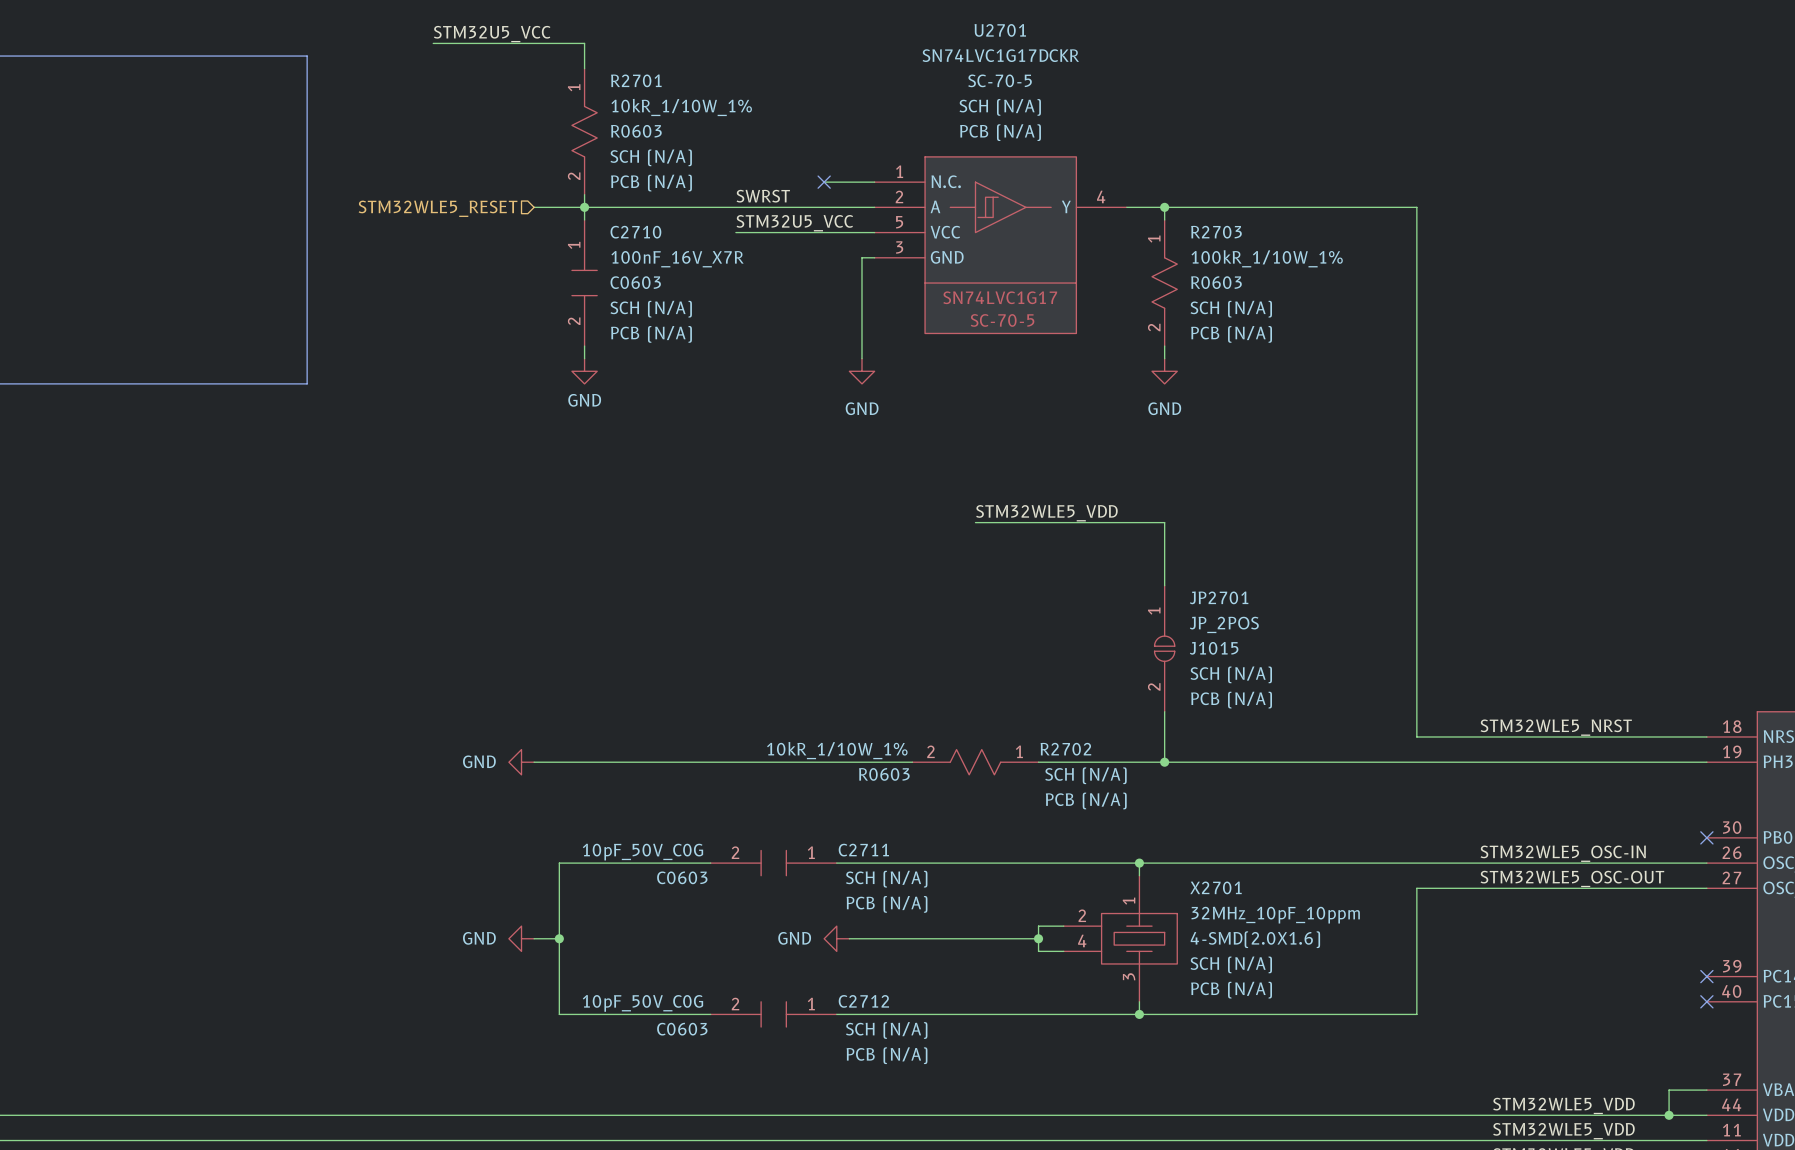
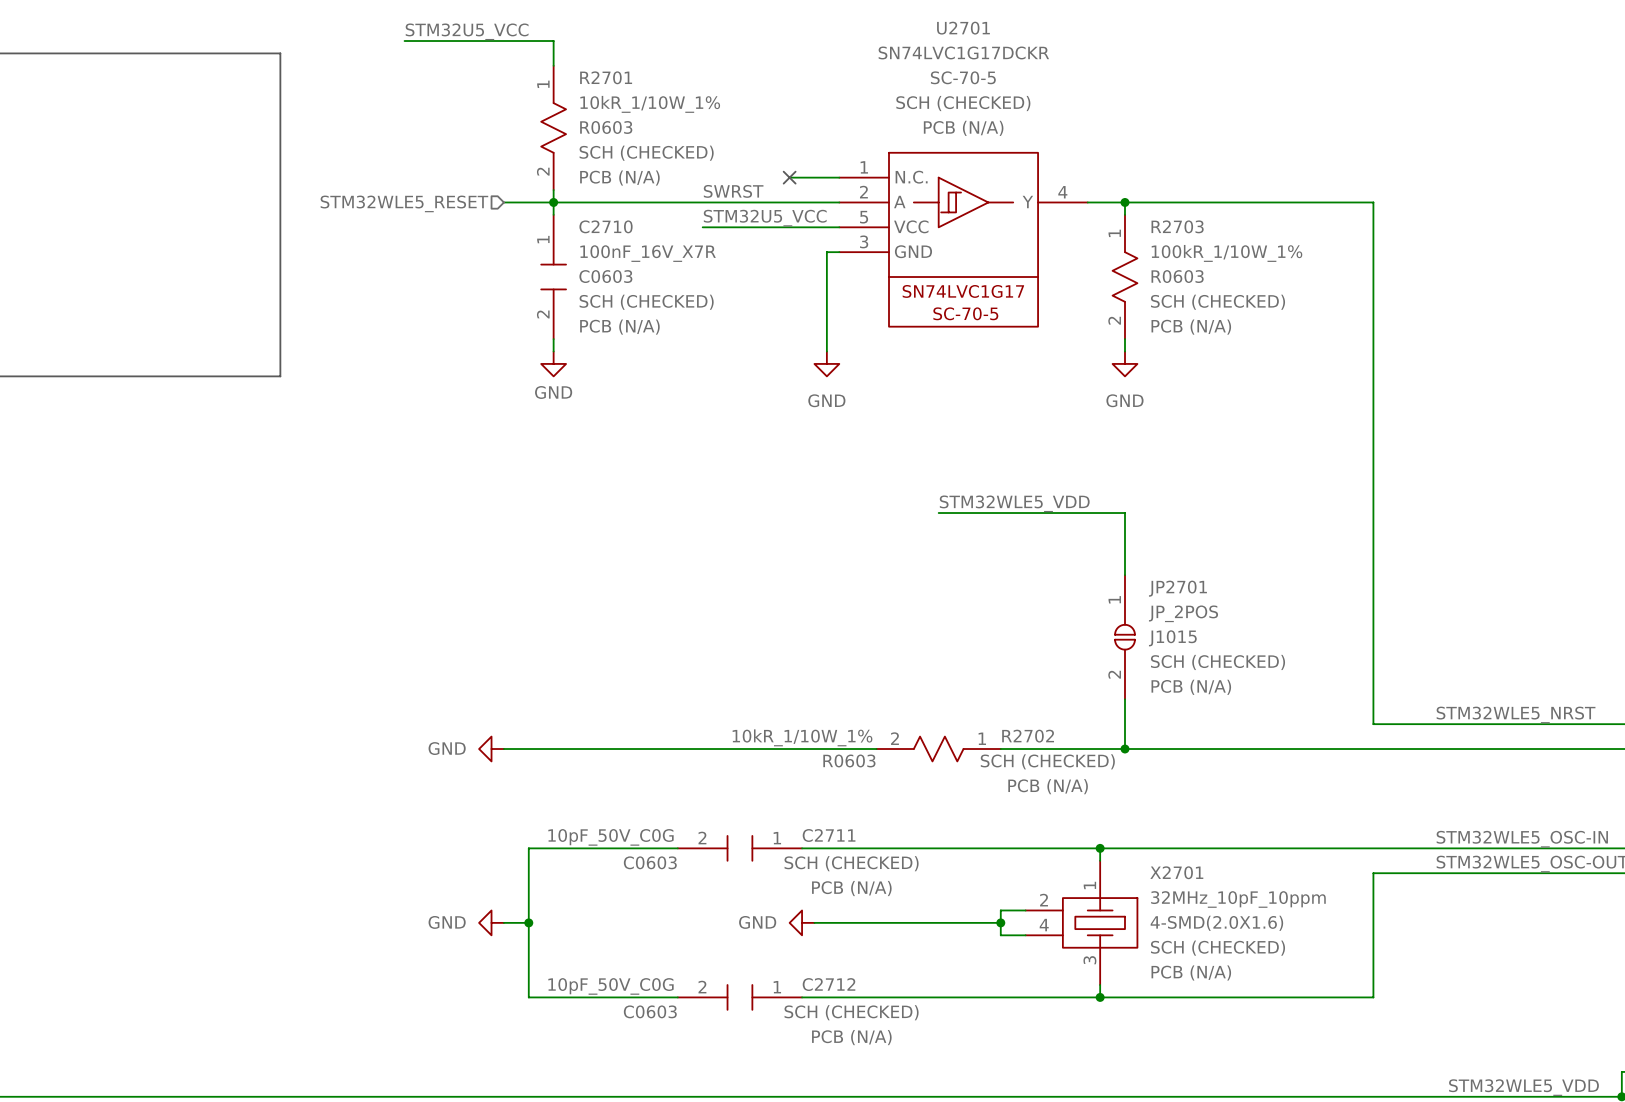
U2701 text: SCH (N/A) (1000, 107) -> SCH (CHECKED) (963, 103)
R2701 text: SCH (N/A) (651, 157) -> SCH (CHECKED) (646, 153)
C2710 text: SCH (N/A) (651, 309) -> SCH (CHECKED) (646, 302)
R2703 text: SCH (N/A) (1231, 309) -> SCH (CHECKED) (1218, 302)
JP2701 text: SCH (N/A) (1231, 674) -> SCH (CHECKED) (1218, 662)
R2702 text: SCH (N/A) (1085, 775) -> SCH (CHECKED) (1047, 761)
C2711 text: SCH (N/A) (886, 879) -> SCH (CHECKED) (851, 863)
X2701 text: SCH (N/A) (1231, 964) -> SCH (CHECKED) (1218, 948)
C2712 text: SCH (N/A) (886, 1030) -> SCH (CHECKED) (851, 1012)

